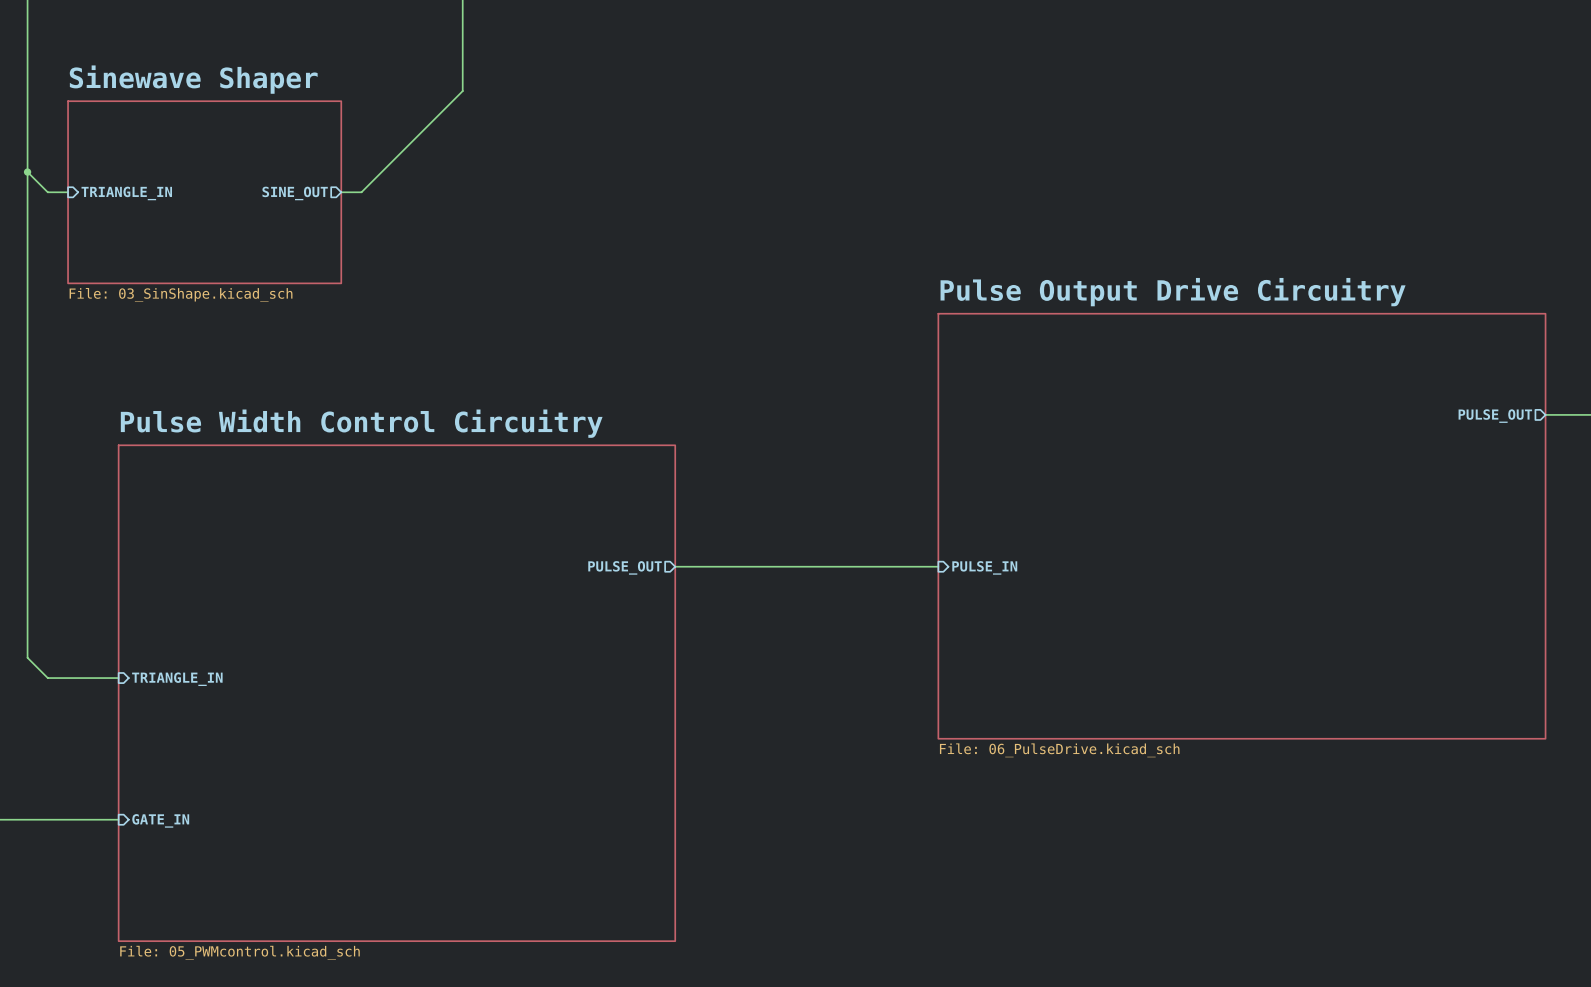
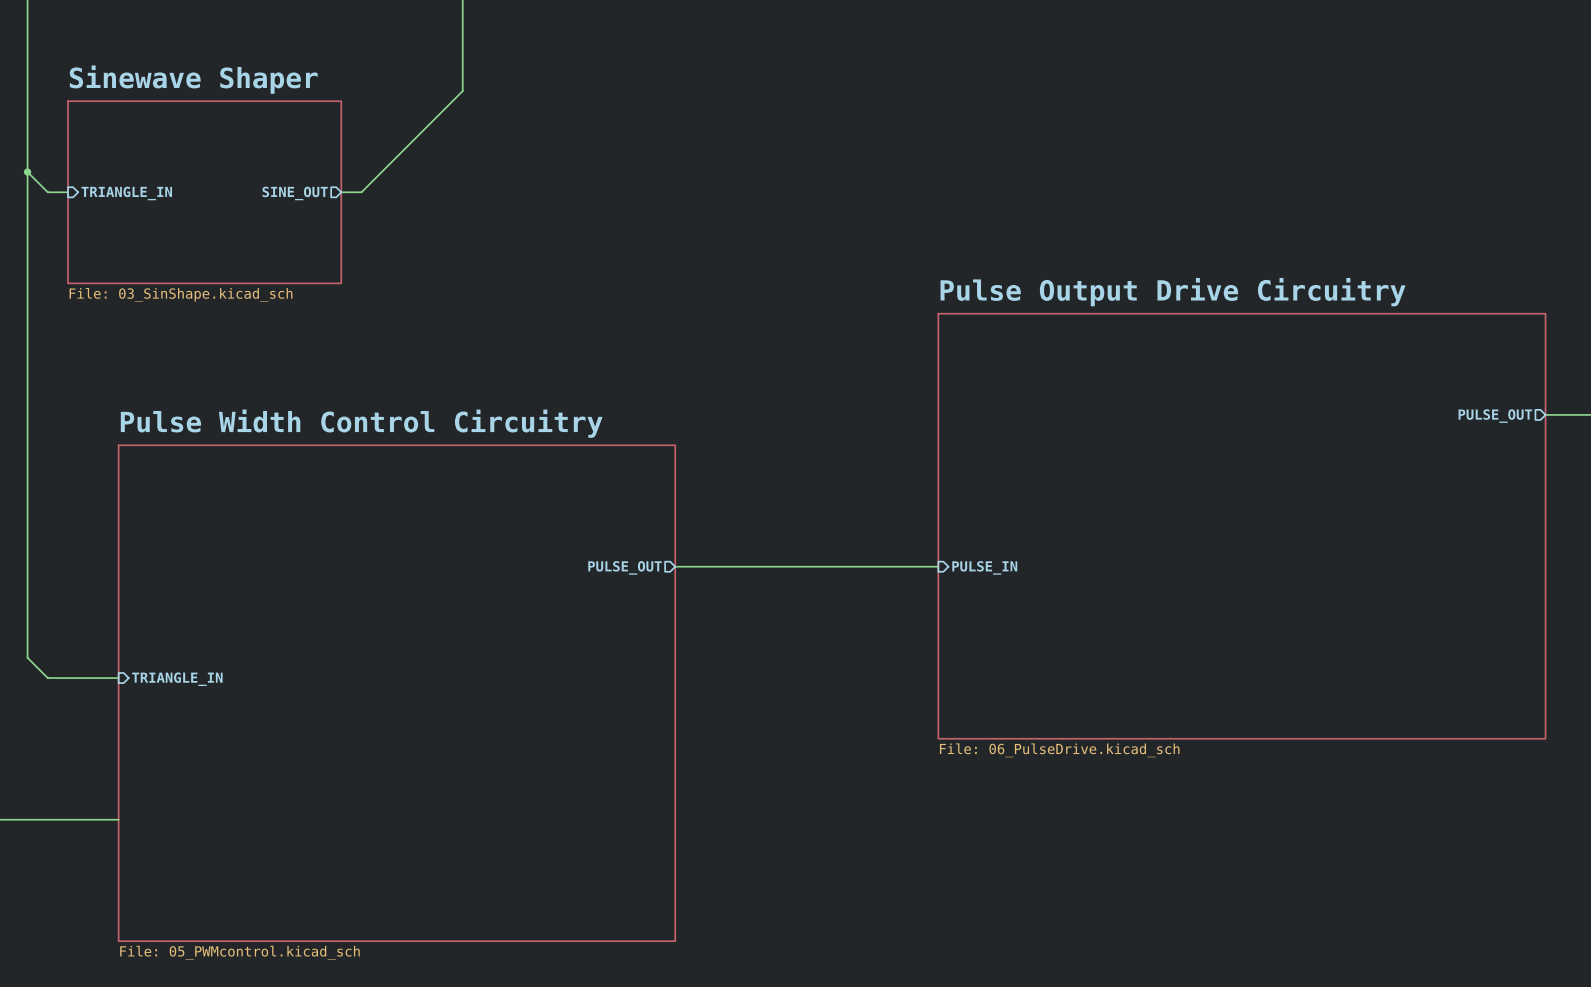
sheet pin: GATE_IN (160, 820) -> none

